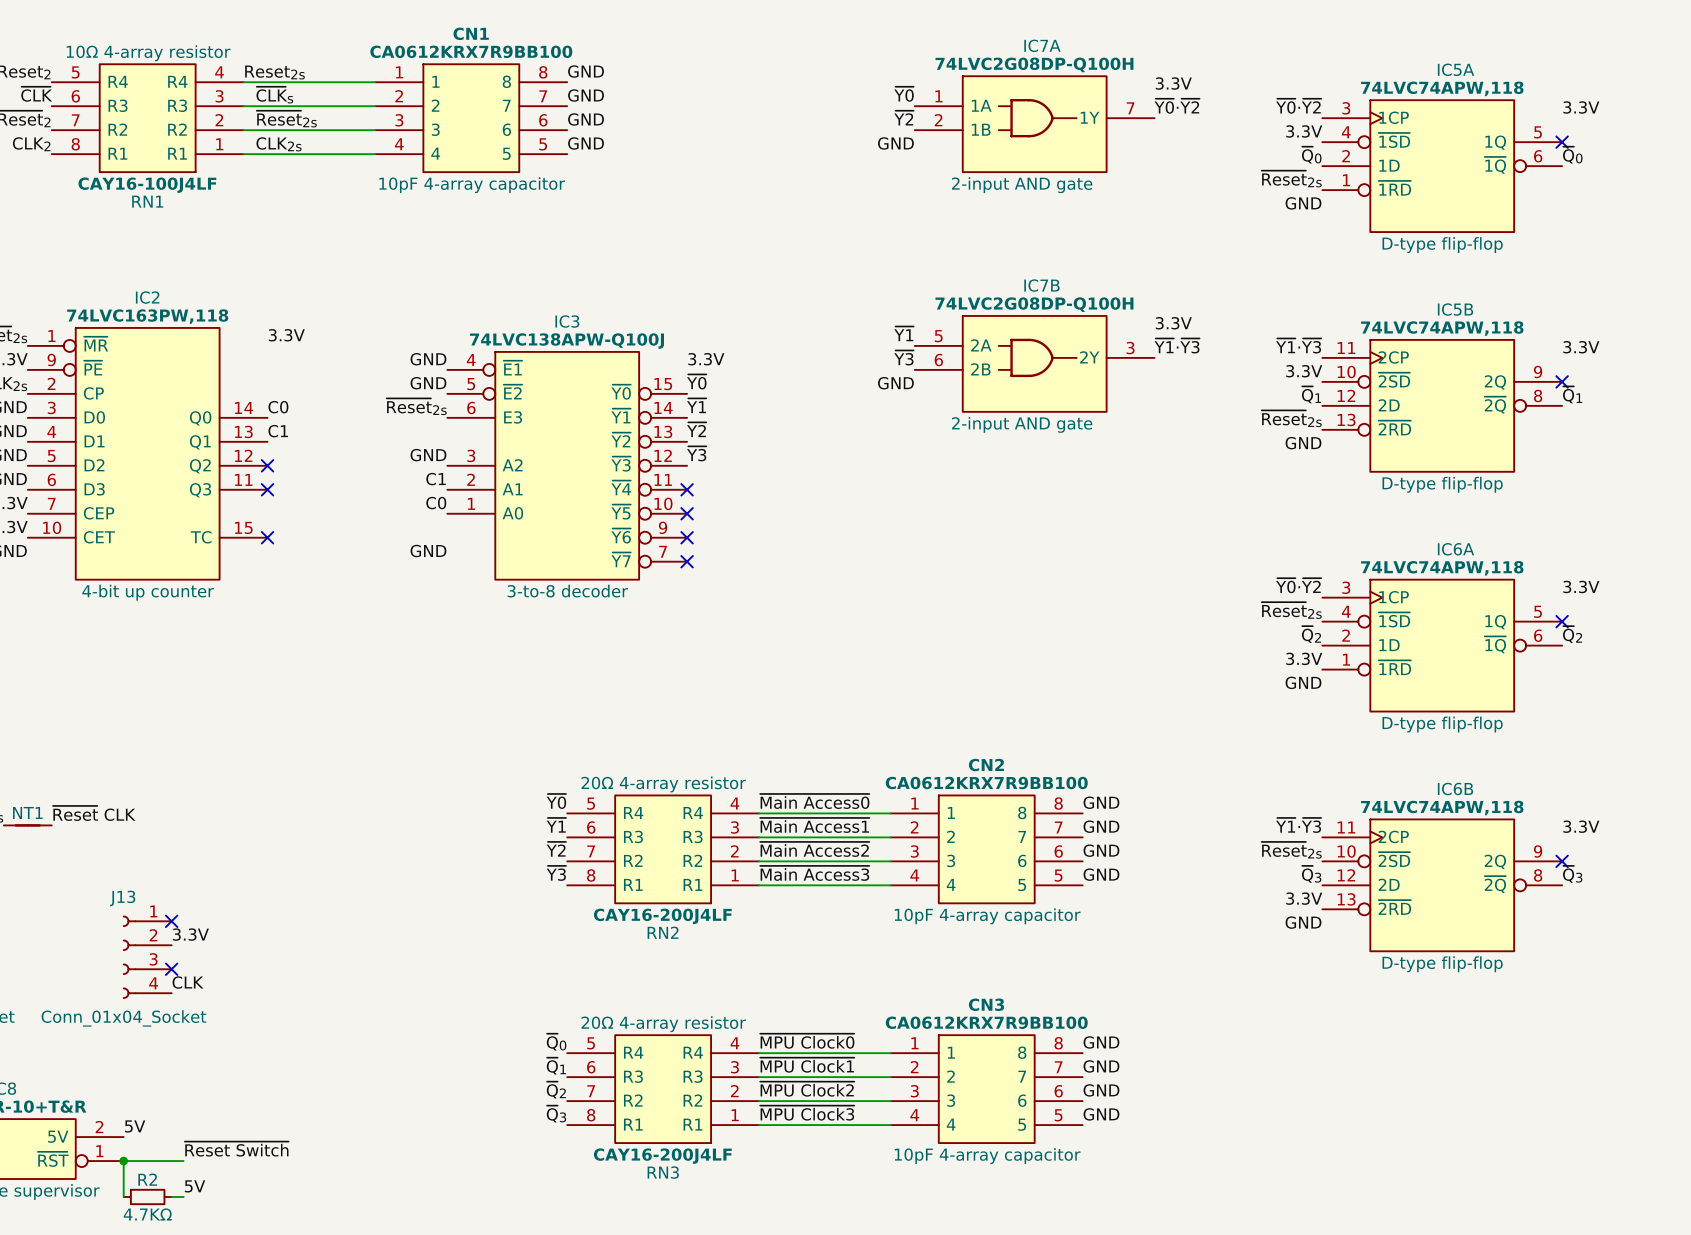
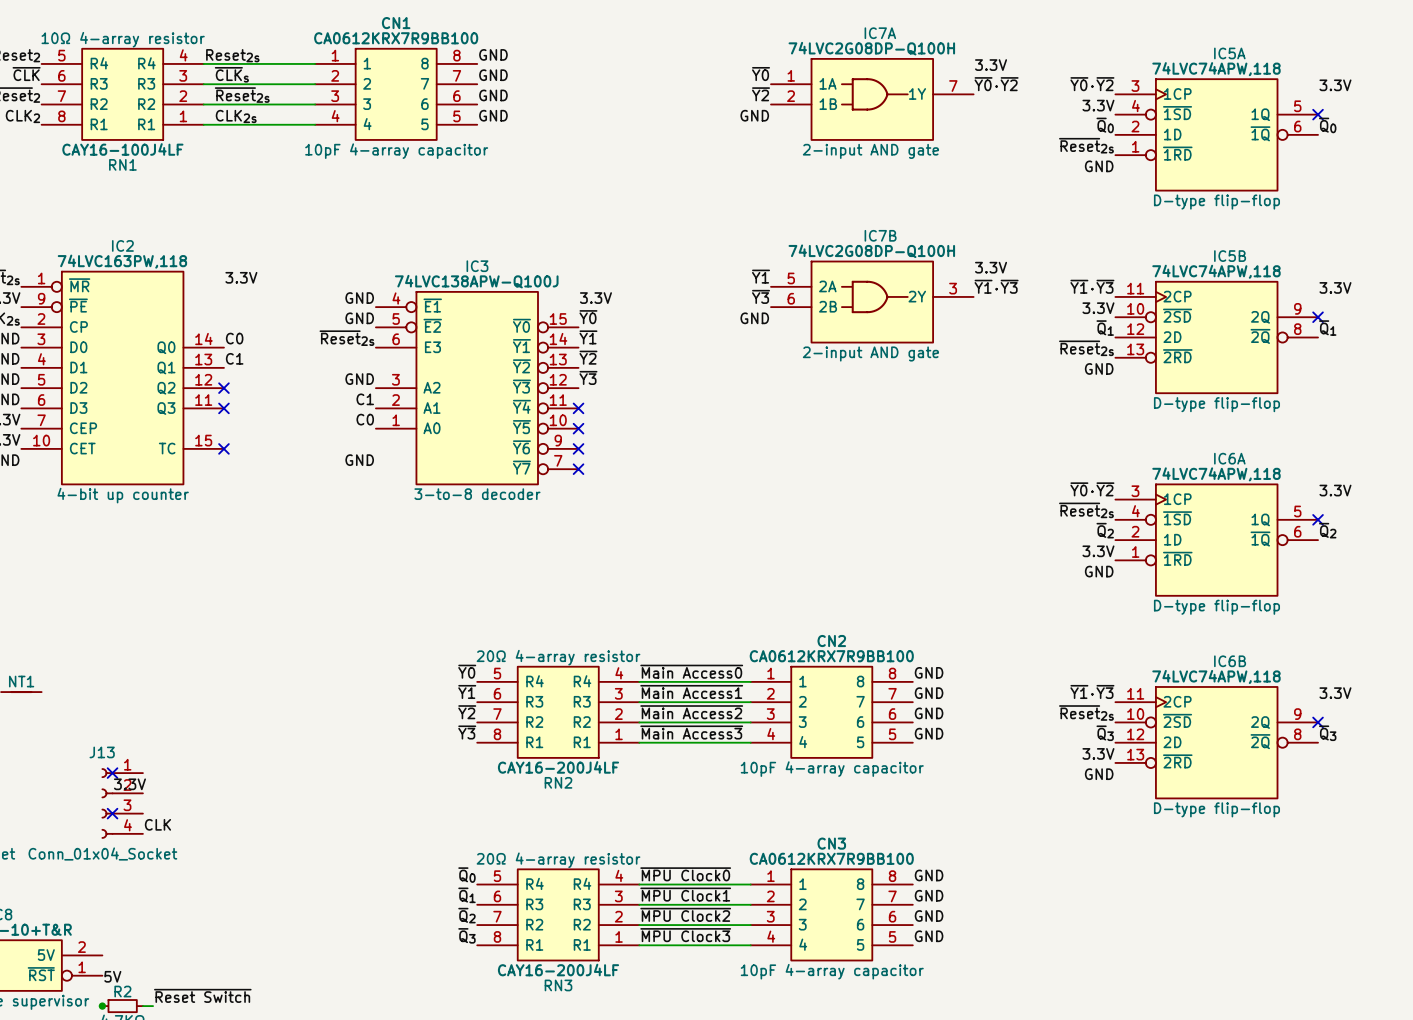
label: ~{Reset} CLK (94, 813) -> none
no-connect mark: none -> (112, 773)
no-connect mark: (171, 921) -> none
label position: 3.3V (190, 934) -> 3.3V (129, 784)
no-connect mark: none -> (112, 813)
no-connect mark: (171, 969) -> none
label position: 5V (135, 1126) -> 5V (112, 976)
label: ~{Reset Switch} (236, 1149) -> none
junction position: (123, 1161) -> (102, 1006)
wire: (183, 1161) (123, 1161) (123, 1196) -> none
label: 5V (195, 1186) -> ~{Reset Switch} (202, 995)

